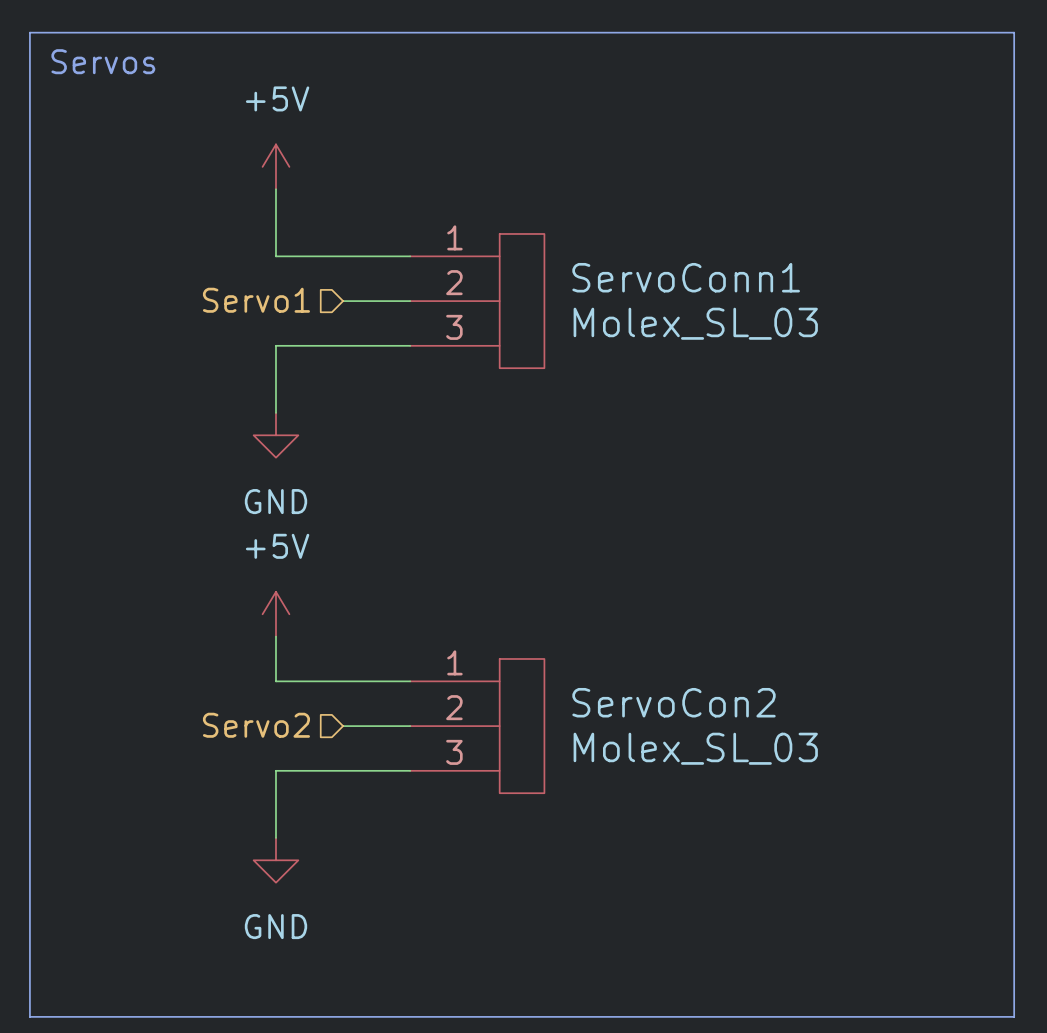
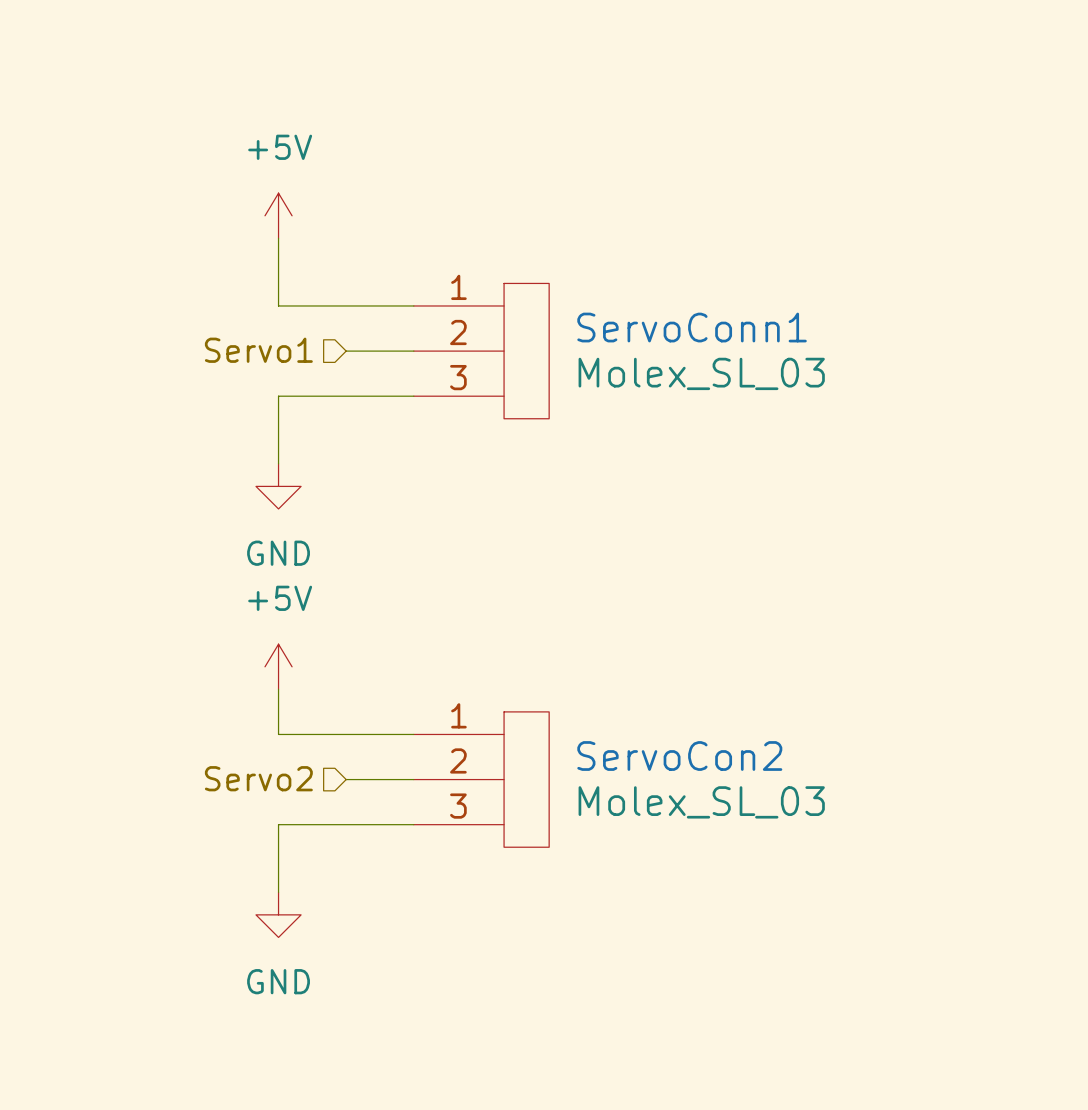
line: (29, 32) (1014, 32) (1014, 1016) (29, 1016) (29, 32) -> none
text: Servos (103, 61) -> none

